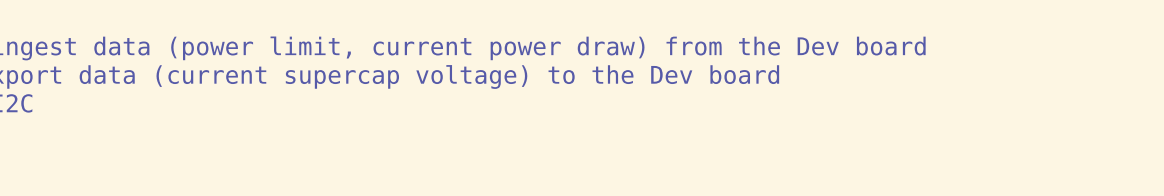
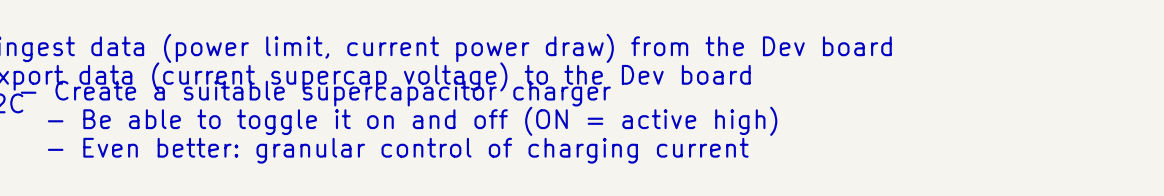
text: none -> - Create a suitable supercapacitor charger (315, 93)
text: none -> - Be able to toggle it on and off (ON = active high) (412, 121)
text: none -> - Even better: granular control of charging current (398, 150)

